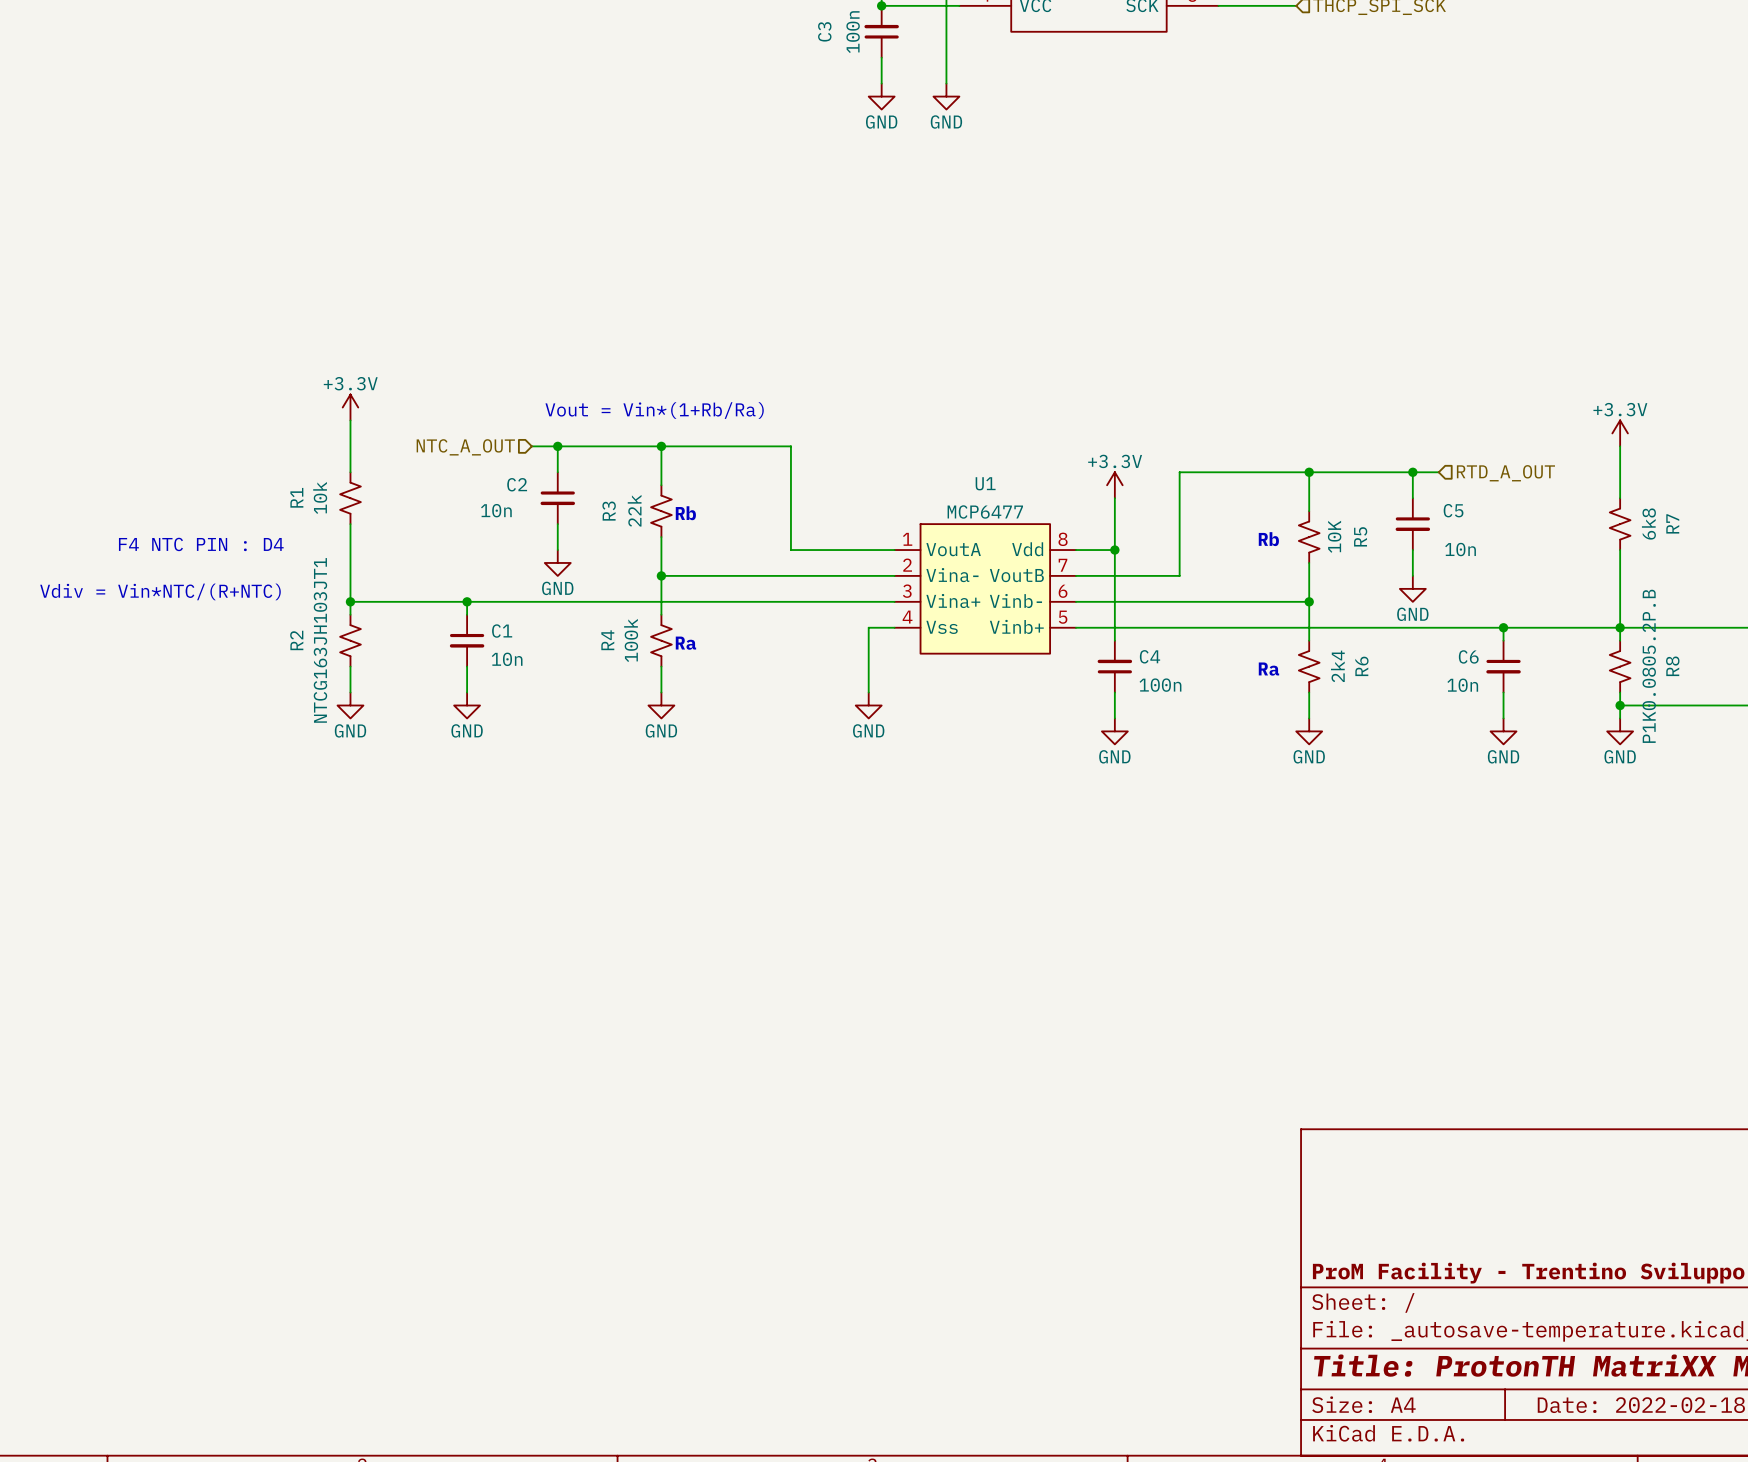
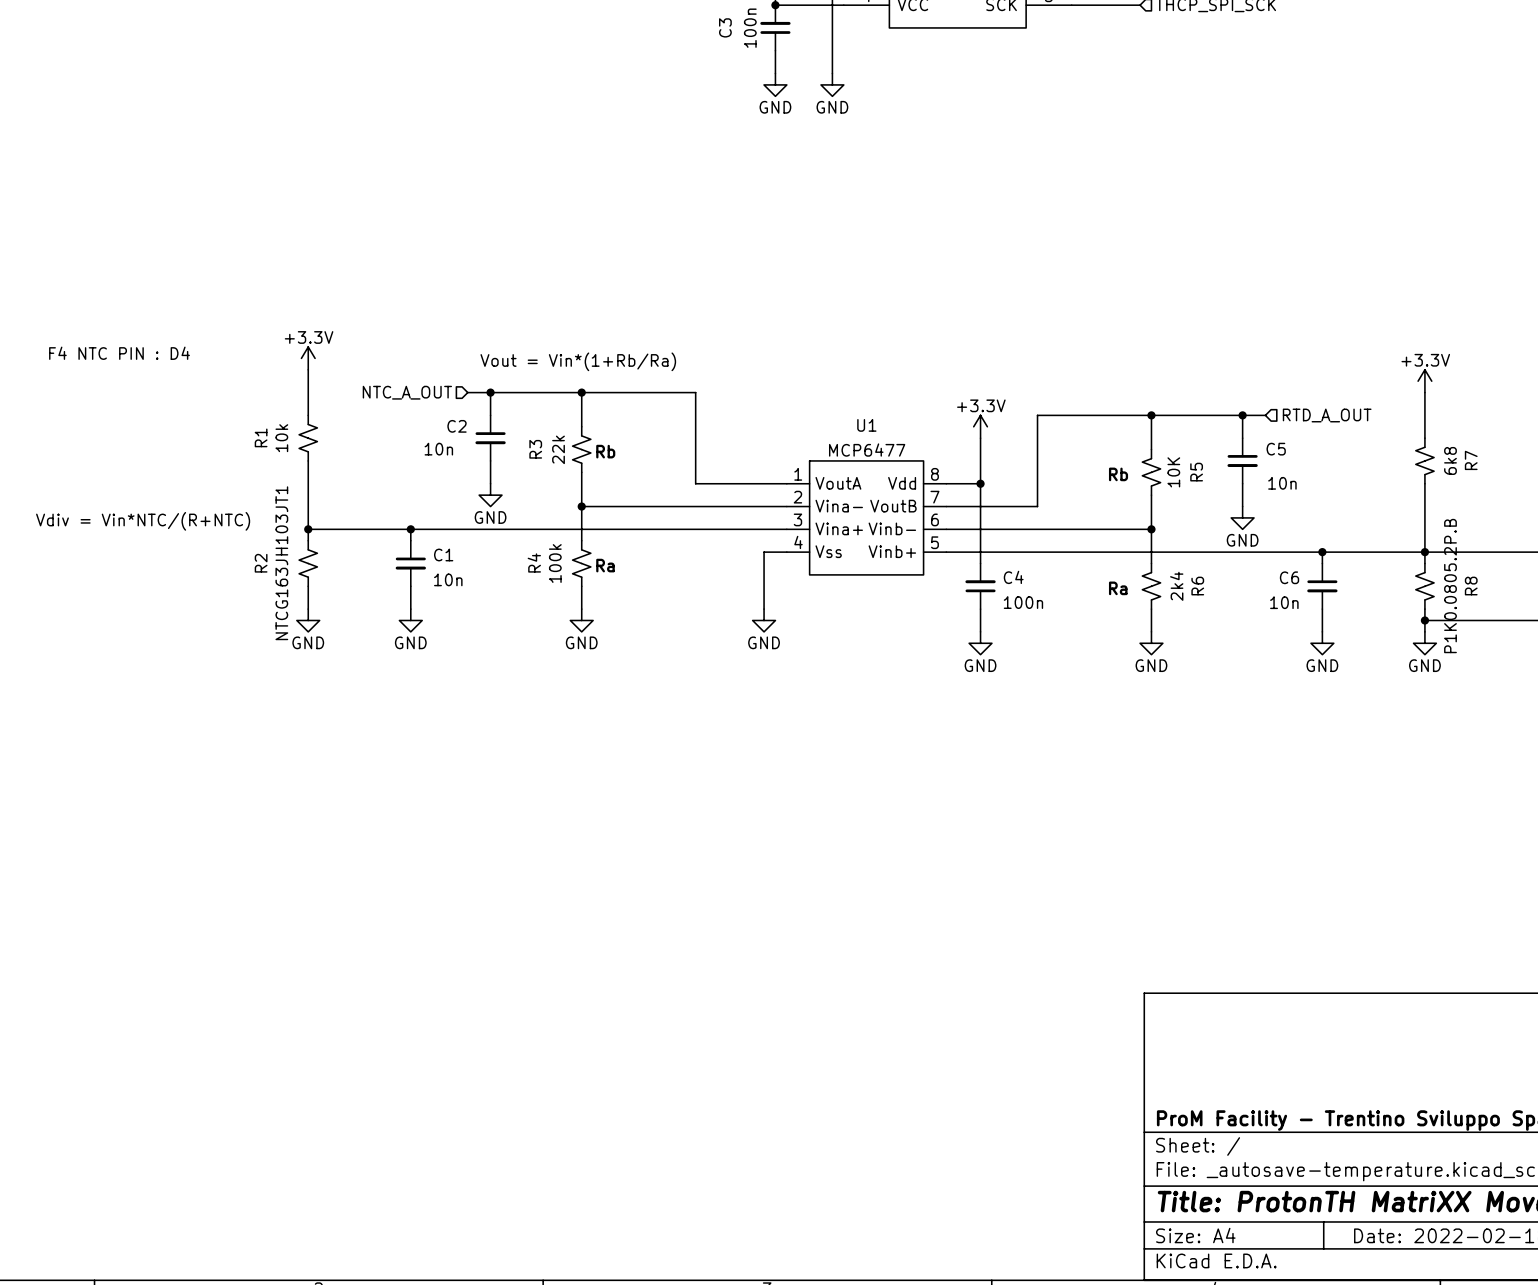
text position: F4 NTC PIN : D4 (201, 544) -> F4 NTC PIN : D4 (119, 353)

